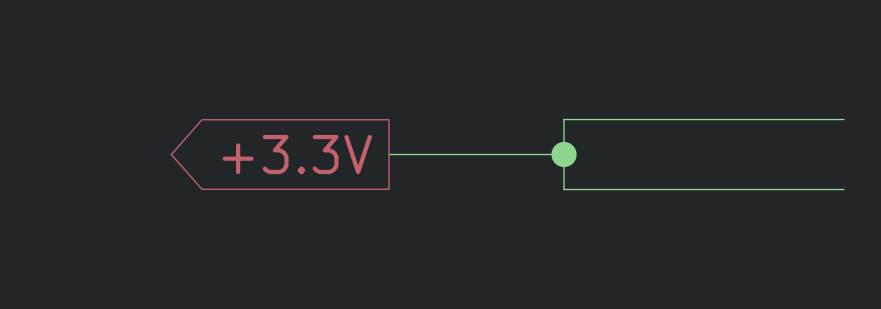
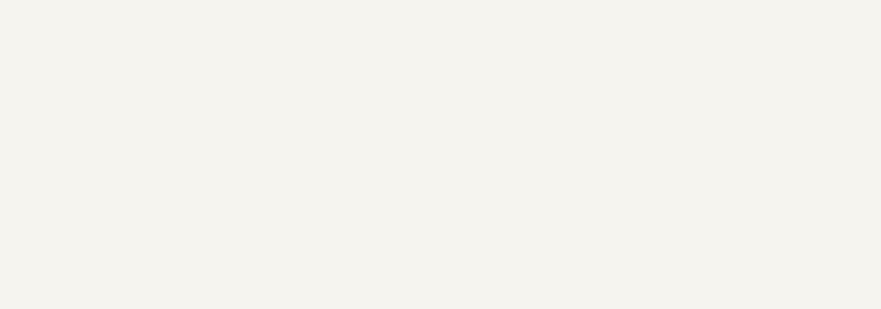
wire: (844, 119) (564, 119) (564, 189) (844, 189) -> none
global label: +3.3V (297, 154) -> none
wire: (389, 154) (564, 154) -> none
junction: (564, 154) -> none

